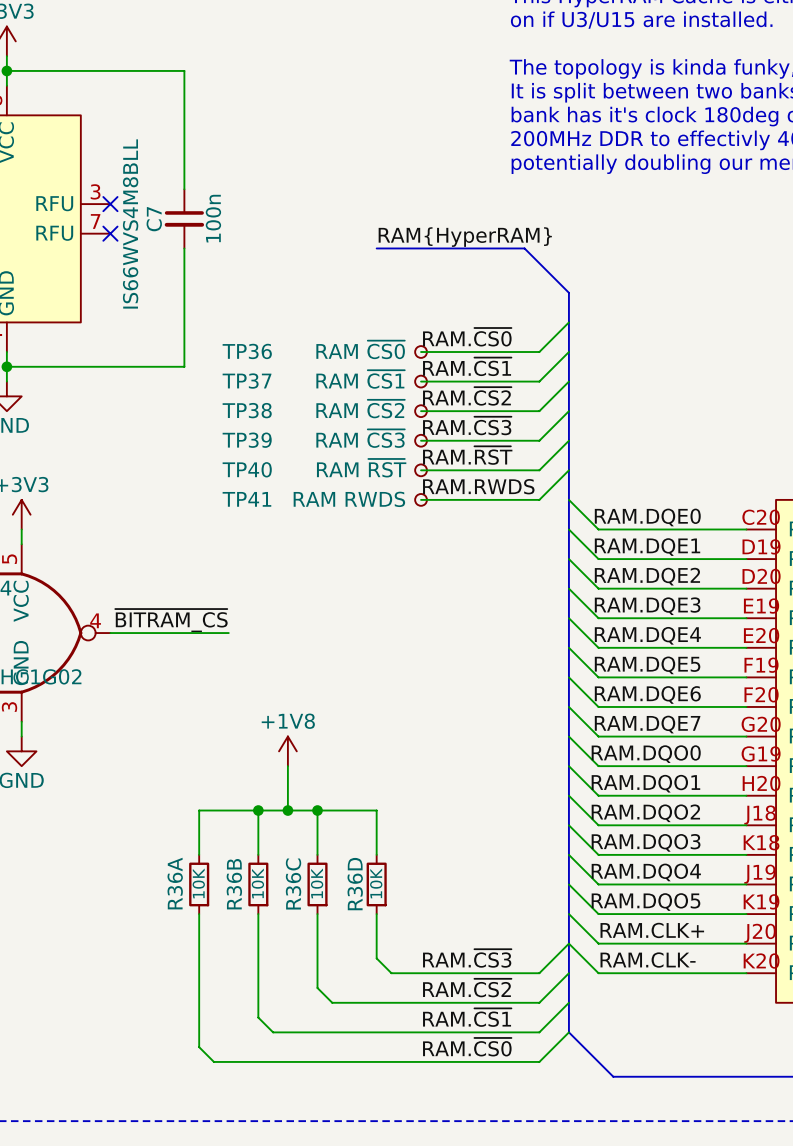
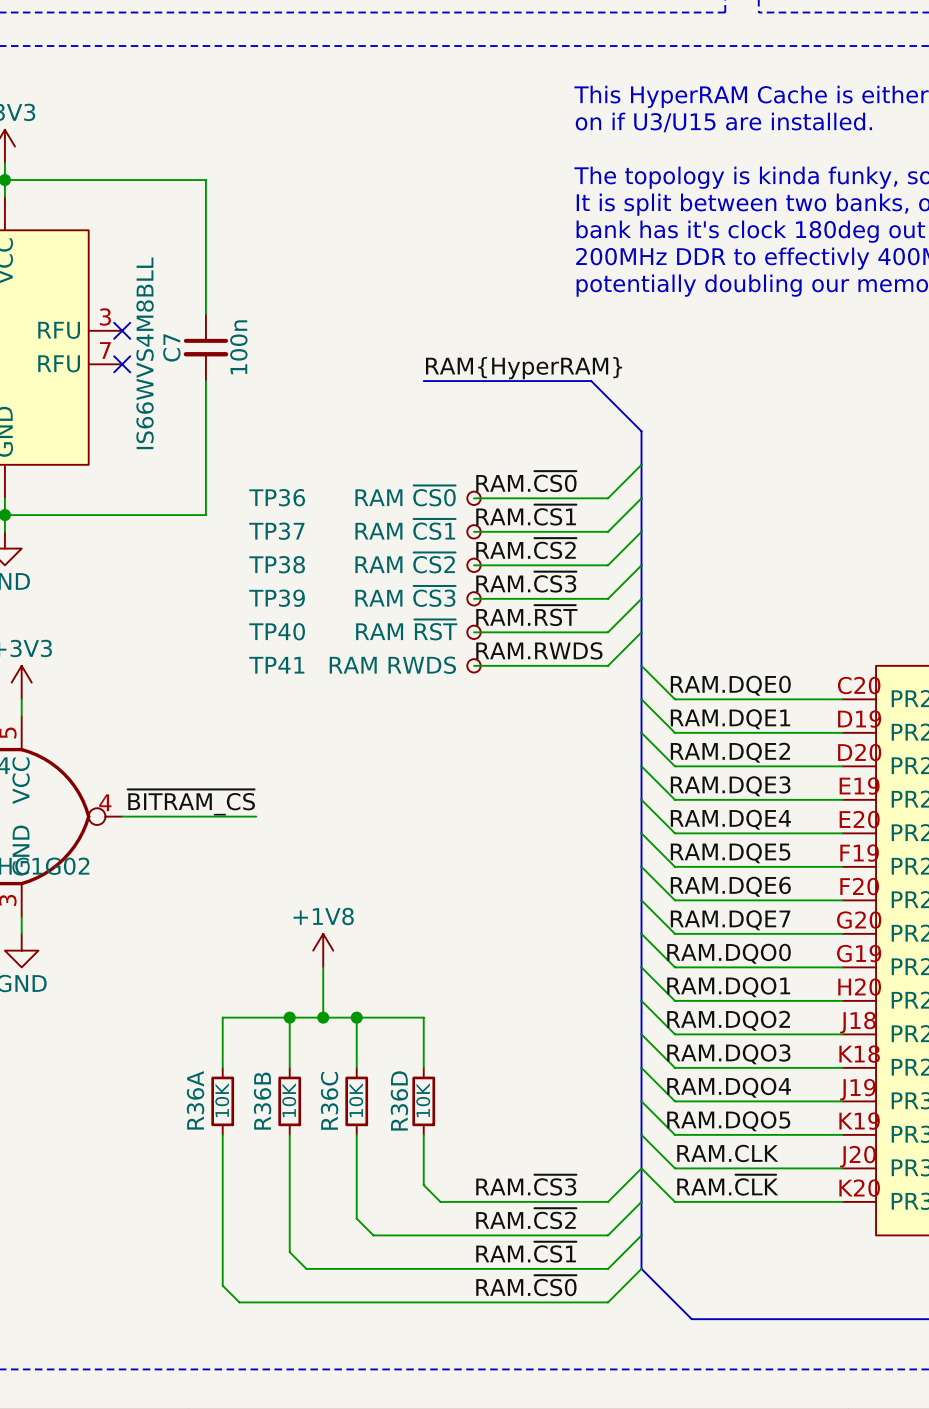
label: RAM.CLK+ (652, 930) -> RAM.CLK (727, 1153)
label: RAM.CLK- (648, 960) -> RAM.~{CLK} (727, 1185)

